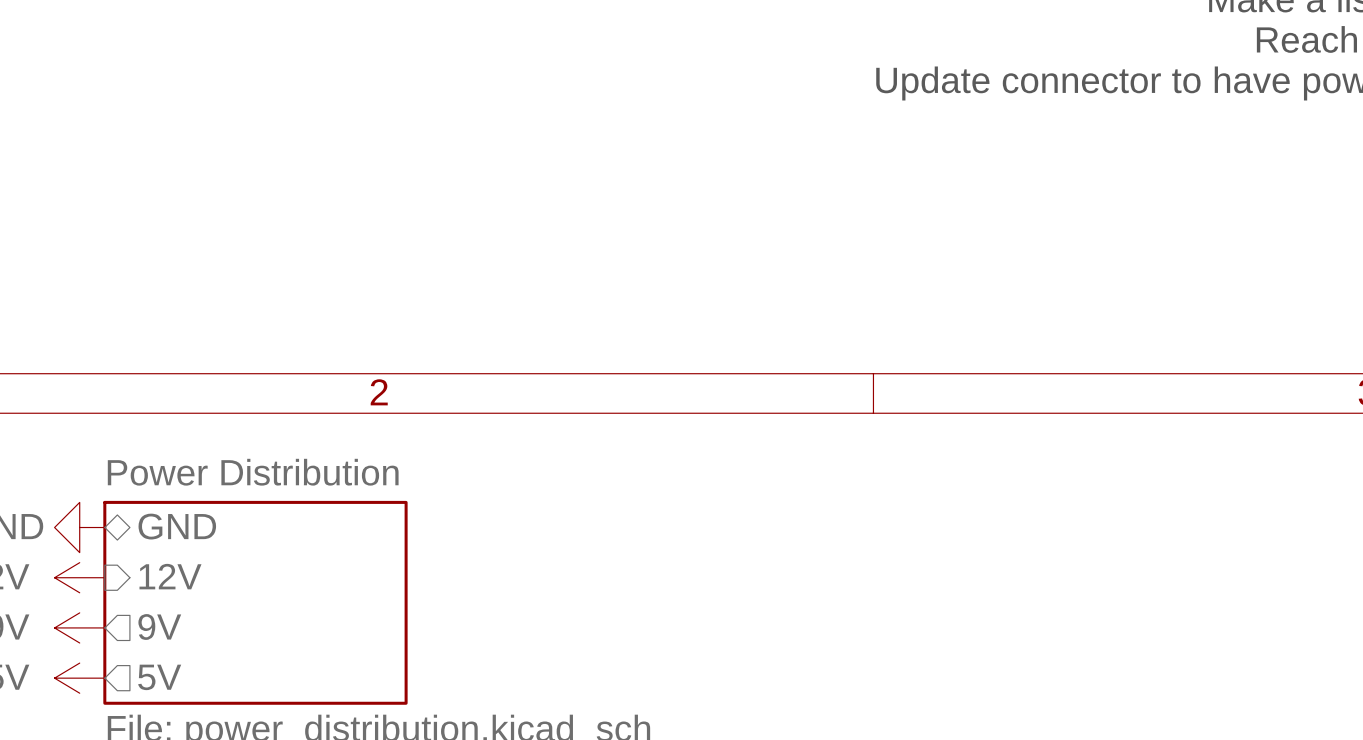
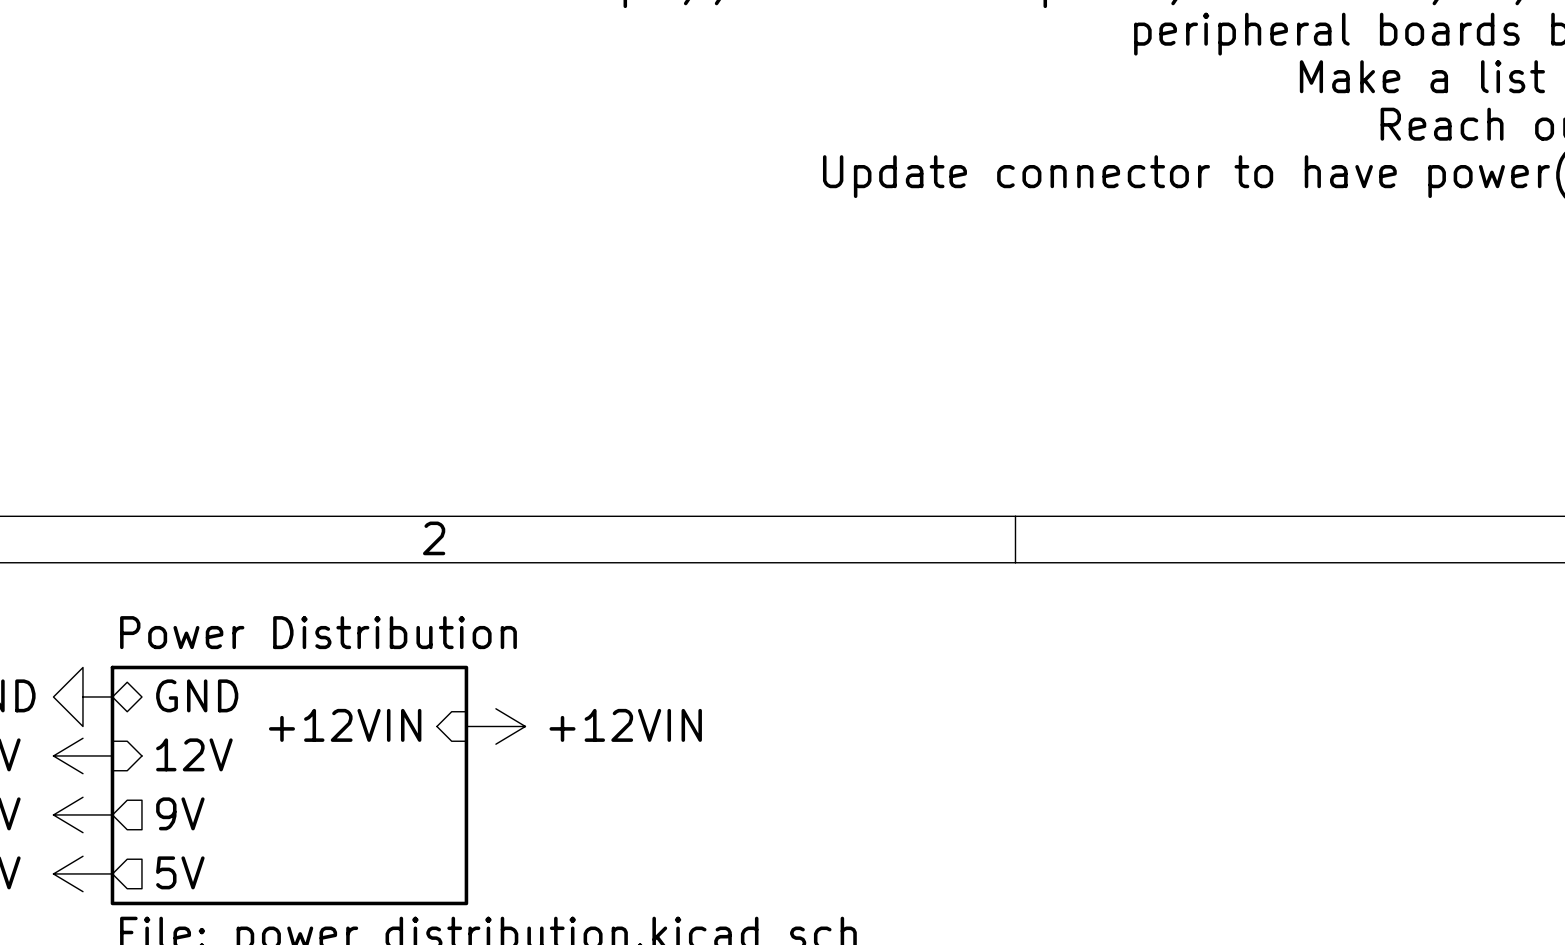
sheet pin: none -> +12VIN (345, 725)
power symbol: none -> +12VIN (495, 726)

